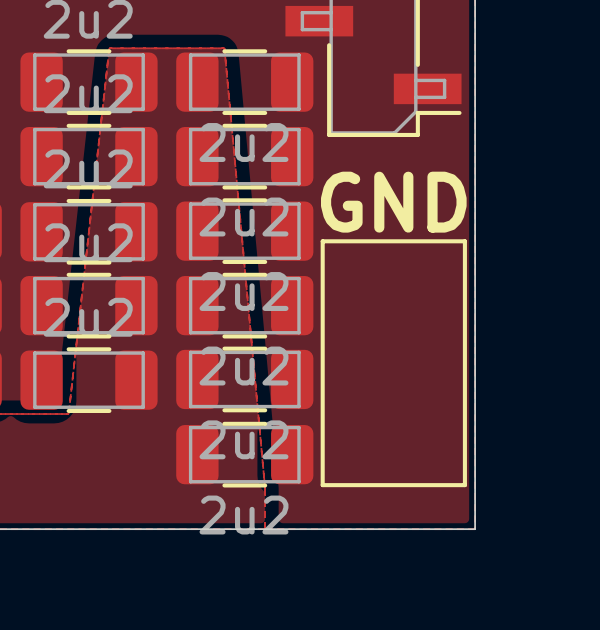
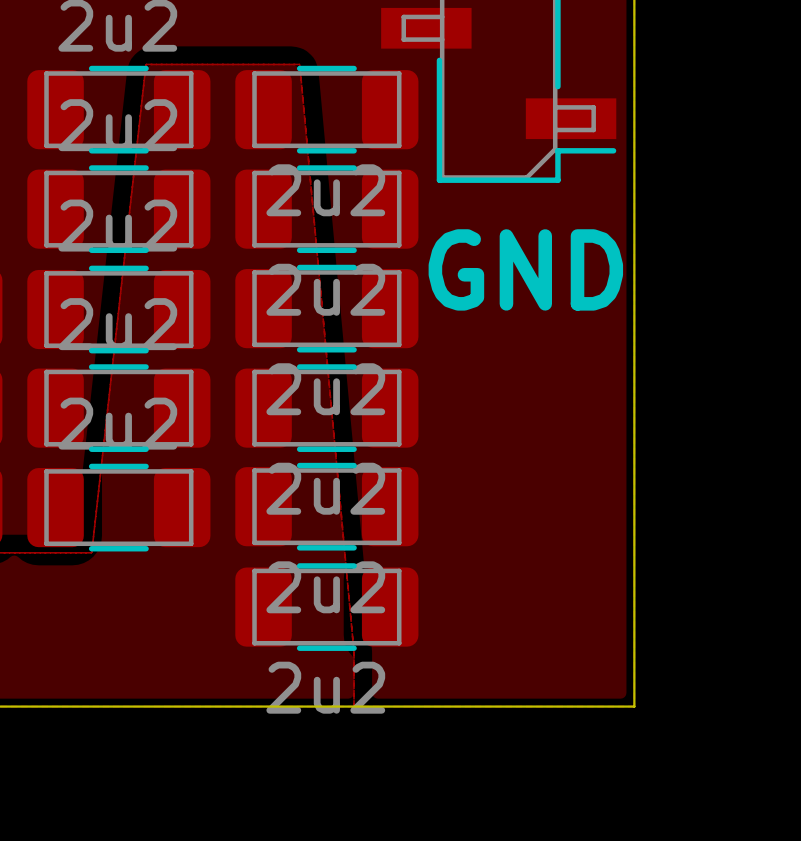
line: (322, 241) (464, 241) (464, 485) (322, 485) (322, 241) -> none

